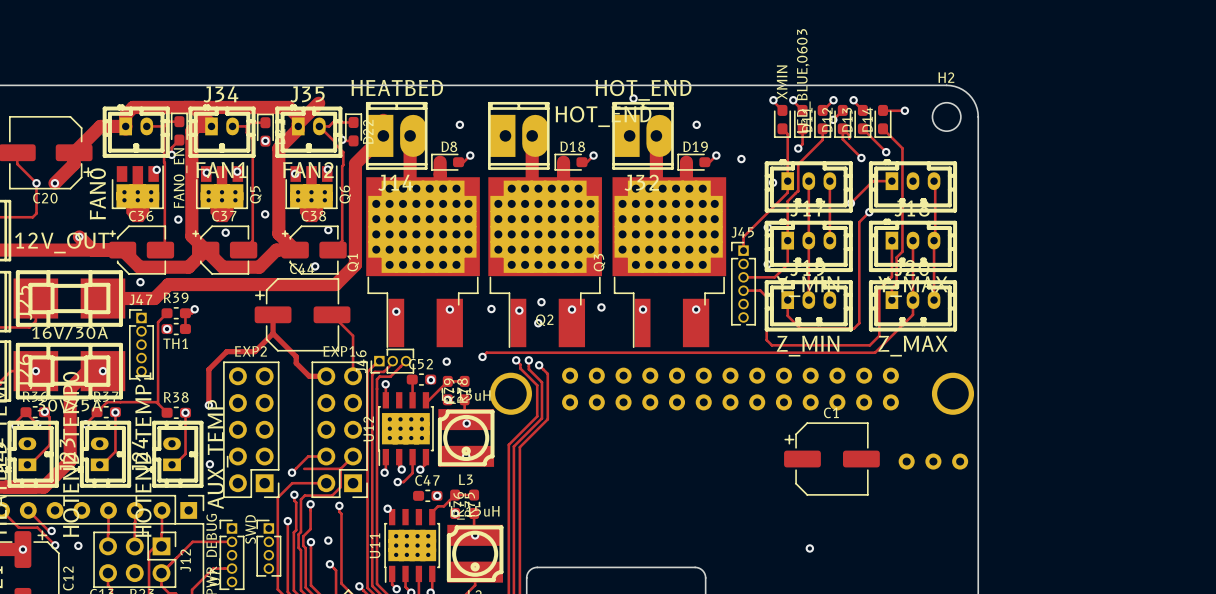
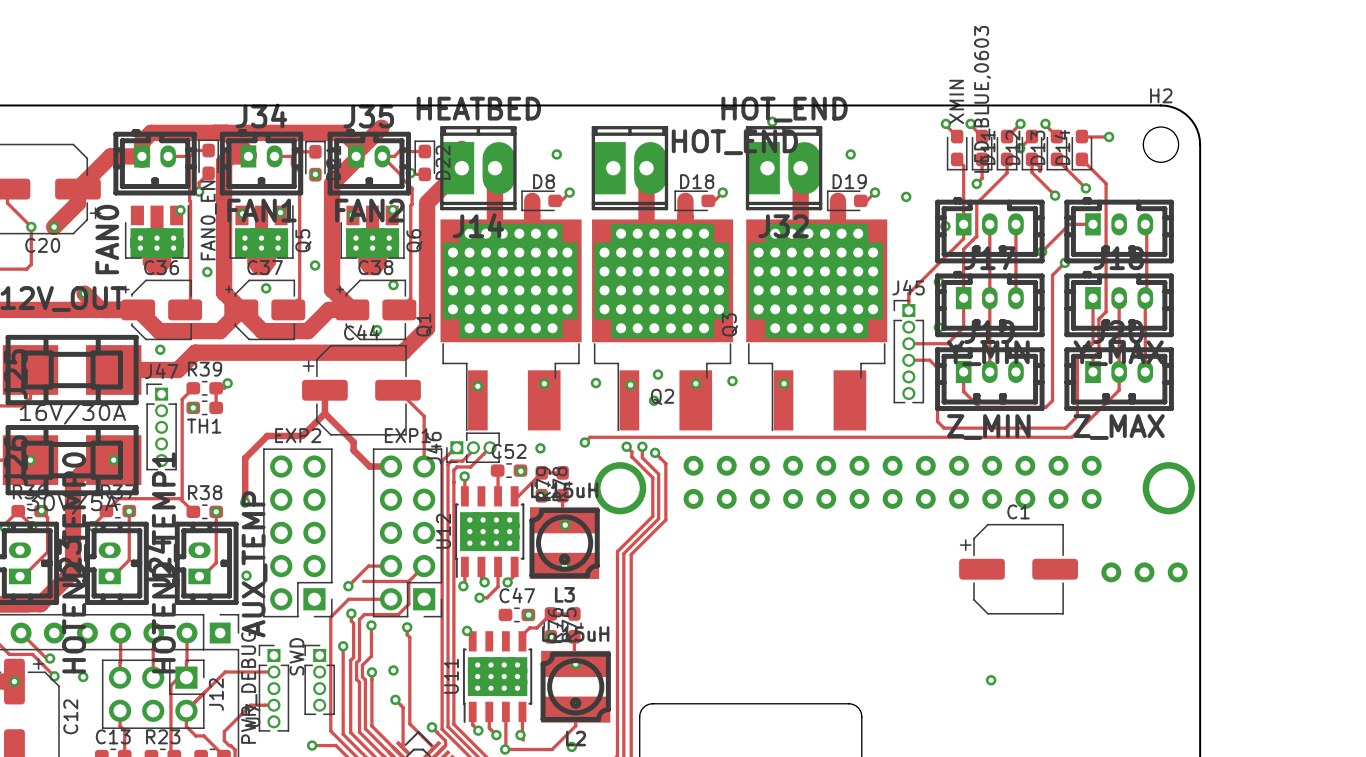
via: (696, 309) -> none

